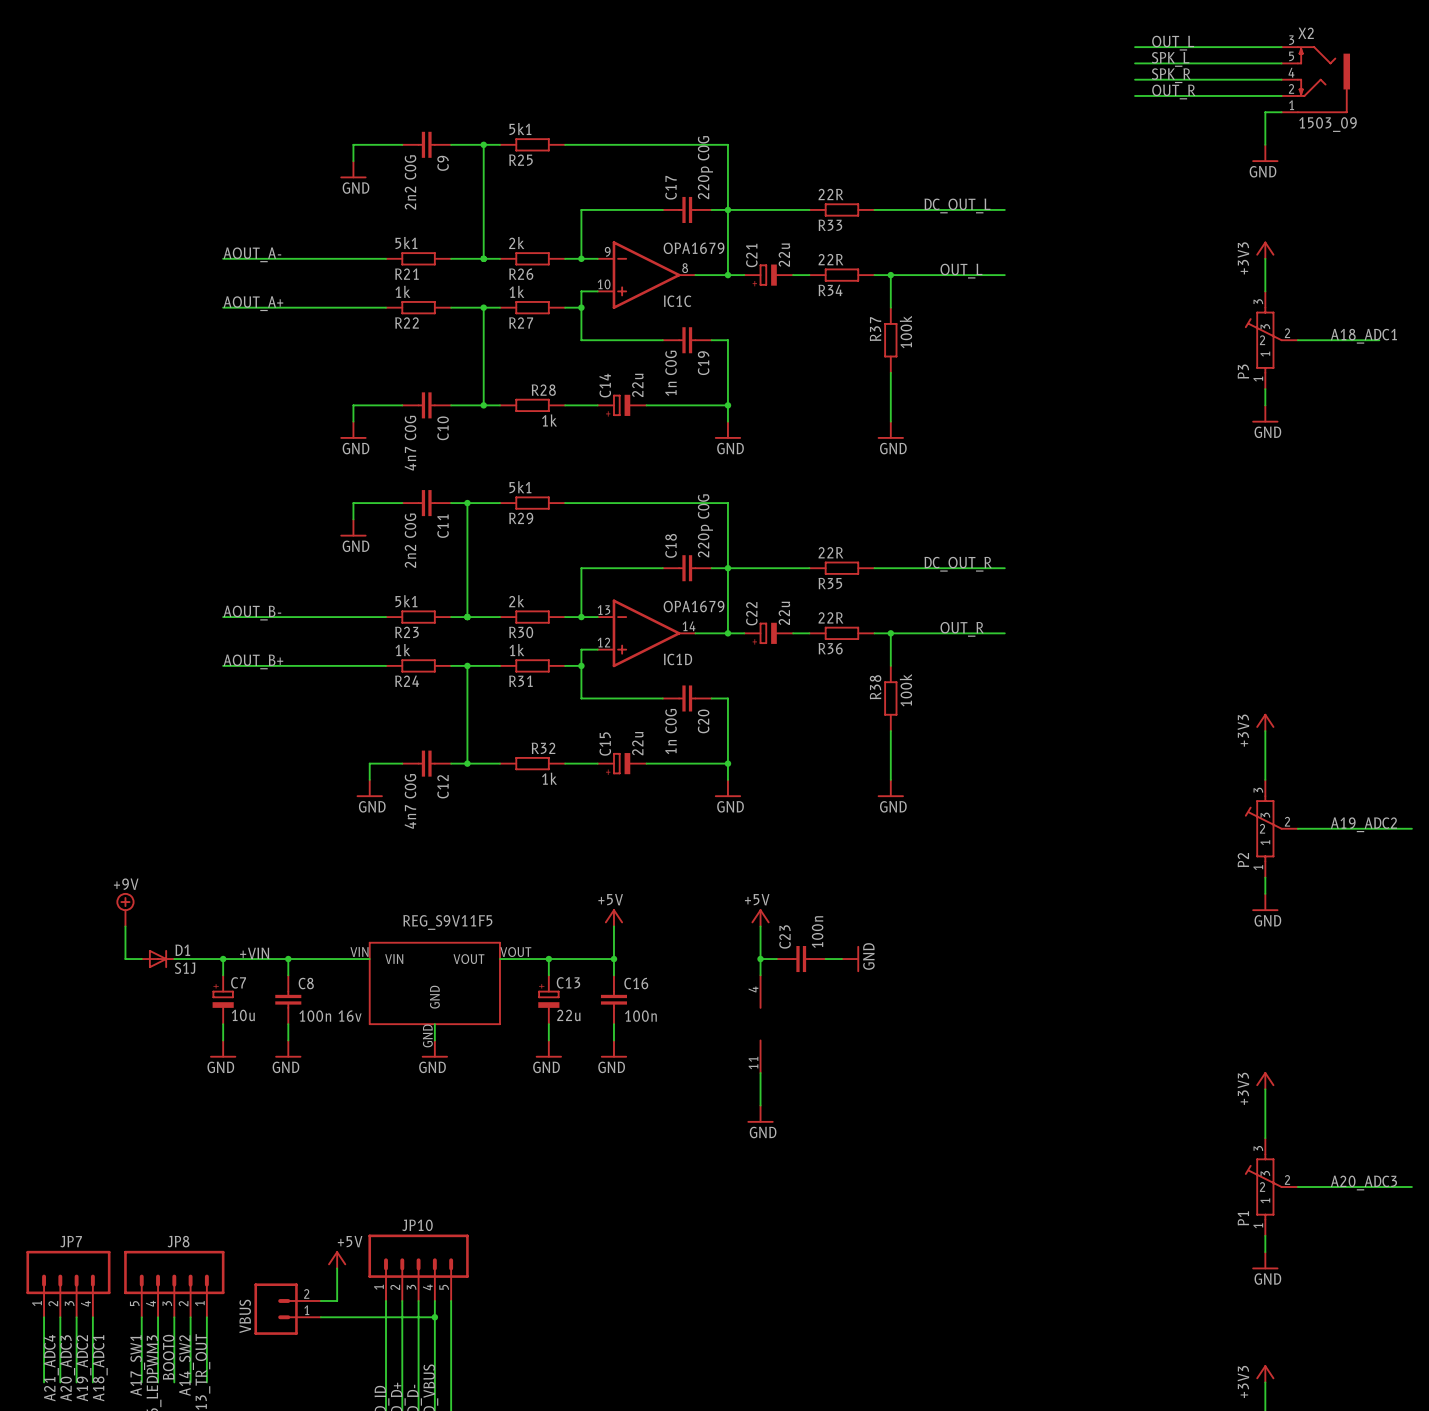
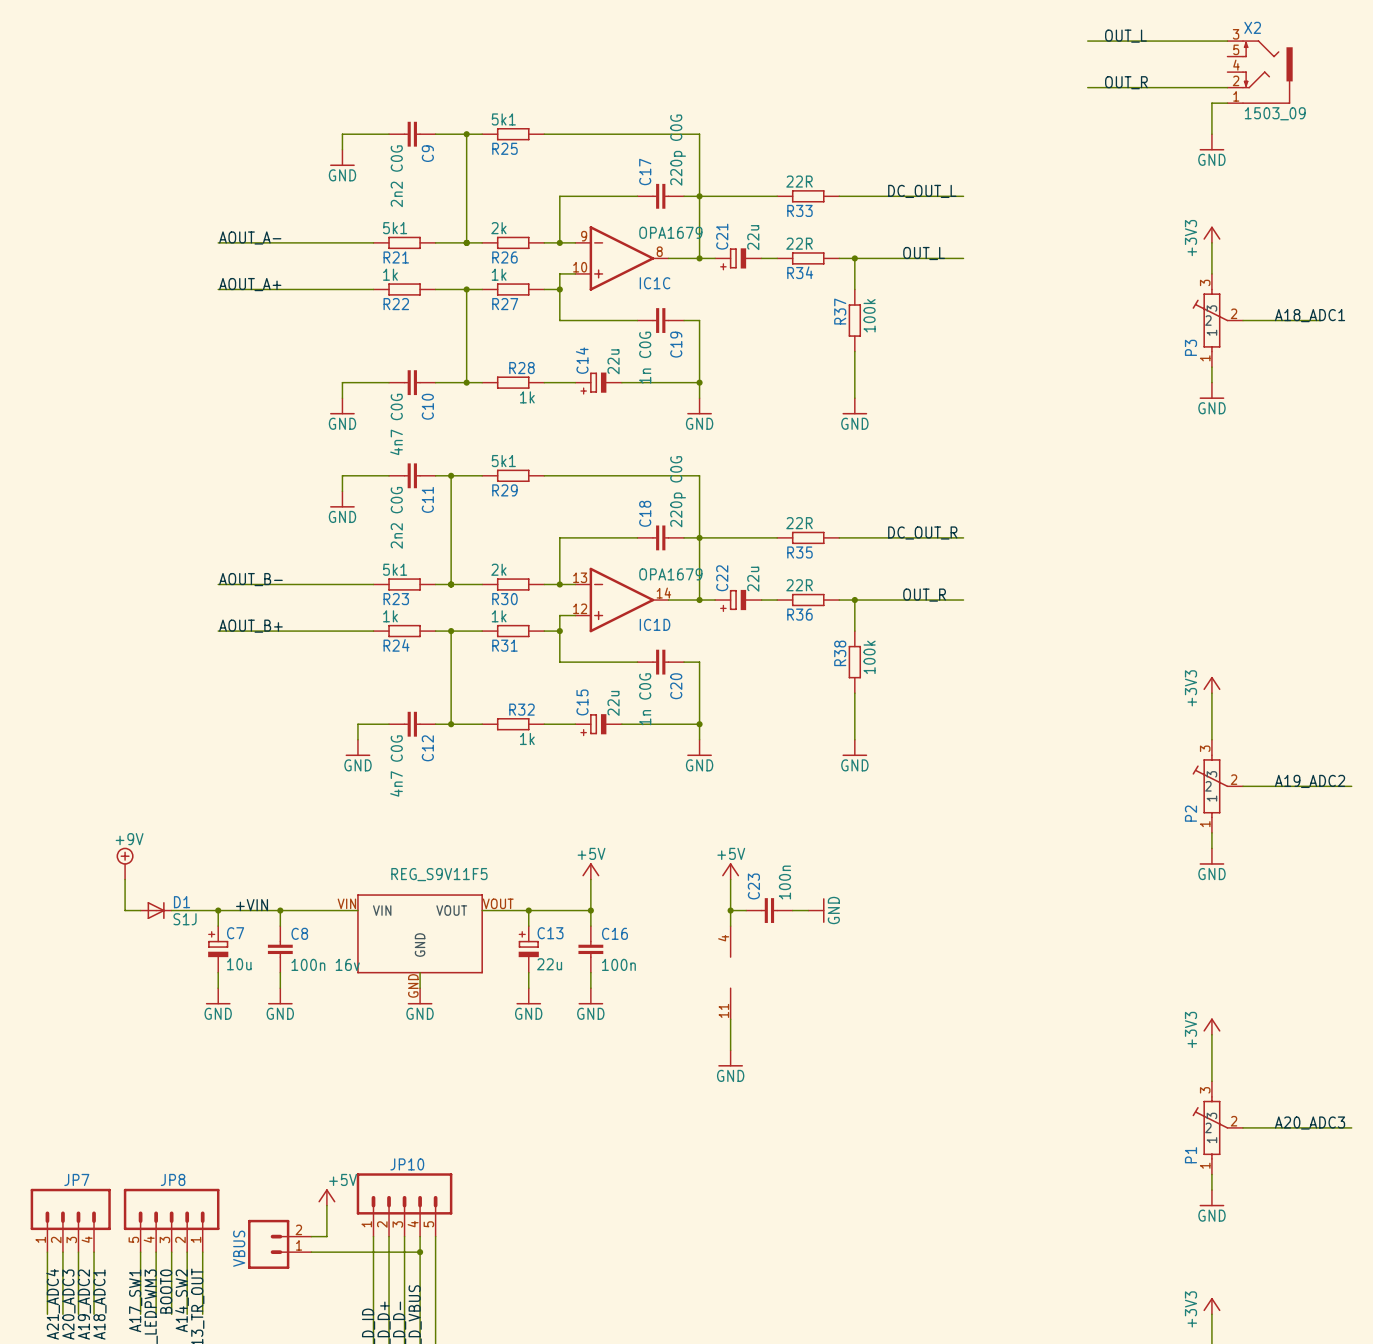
label: SPK_L (1170, 59) -> none
wire: (1135, 63) (1281, 63) -> none
label: SPK_R (1171, 75) -> none
wire: (1135, 79) (1281, 79) -> none

